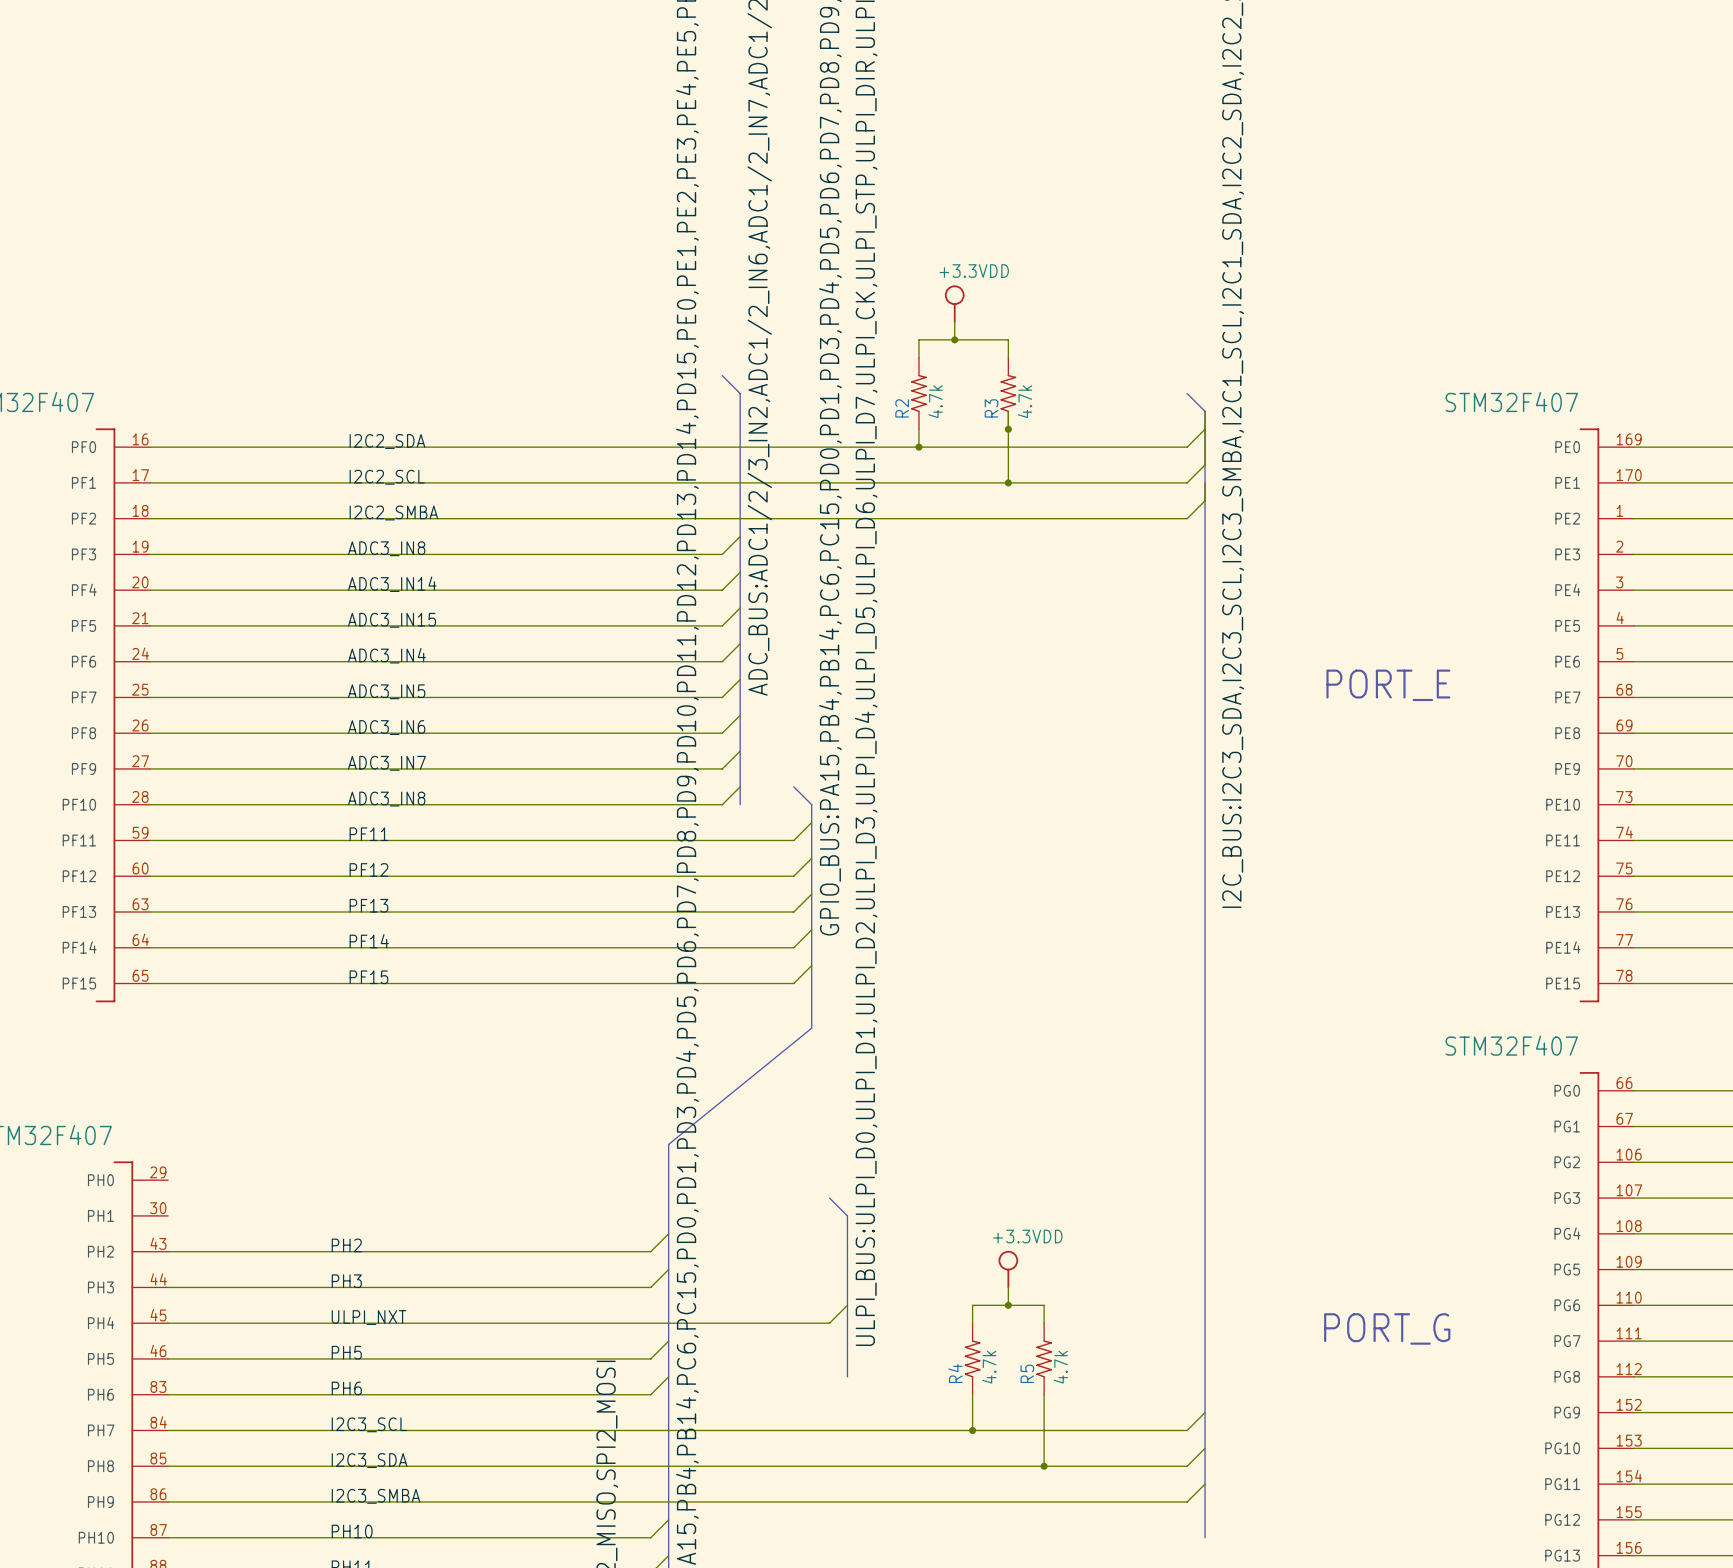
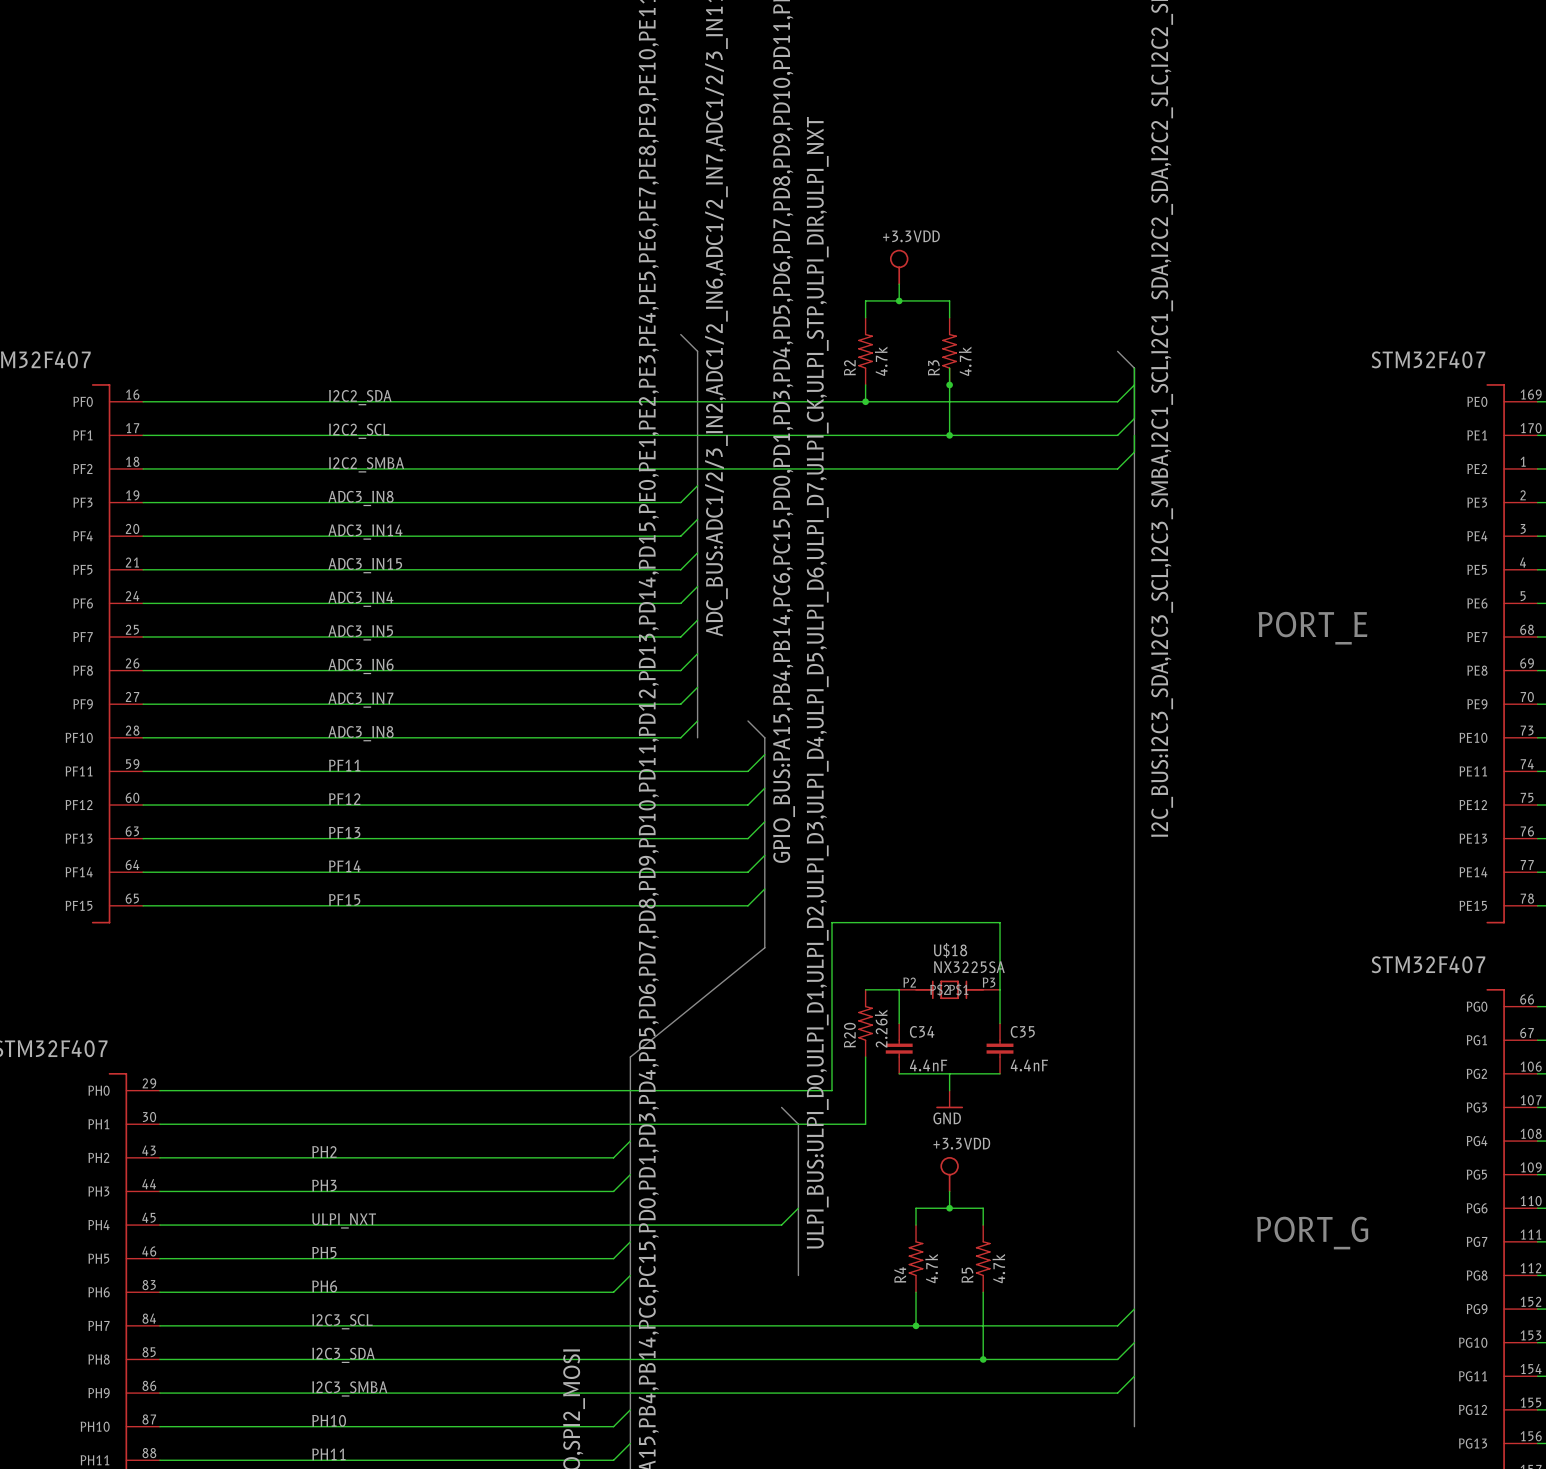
wire: none -> (865, 989) (899, 989) (899, 1023)
U$18: none -> NX3225SA (949, 989)
R20: none -> 2.26k (865, 1023)
wire: none -> (1000, 1023) (1000, 922) (832, 922) (832, 1090) (159, 1090)
C34: none -> 4.4nF (899, 1048)
C35: none -> 4.4nF (1000, 1048)
wire: none -> (865, 1057) (865, 1124) (159, 1124)
wire: none -> (899, 1073) (1000, 1073)
wire: none -> (949, 1073) (949, 1090)
power symbol: none -> GND (949, 1099)

